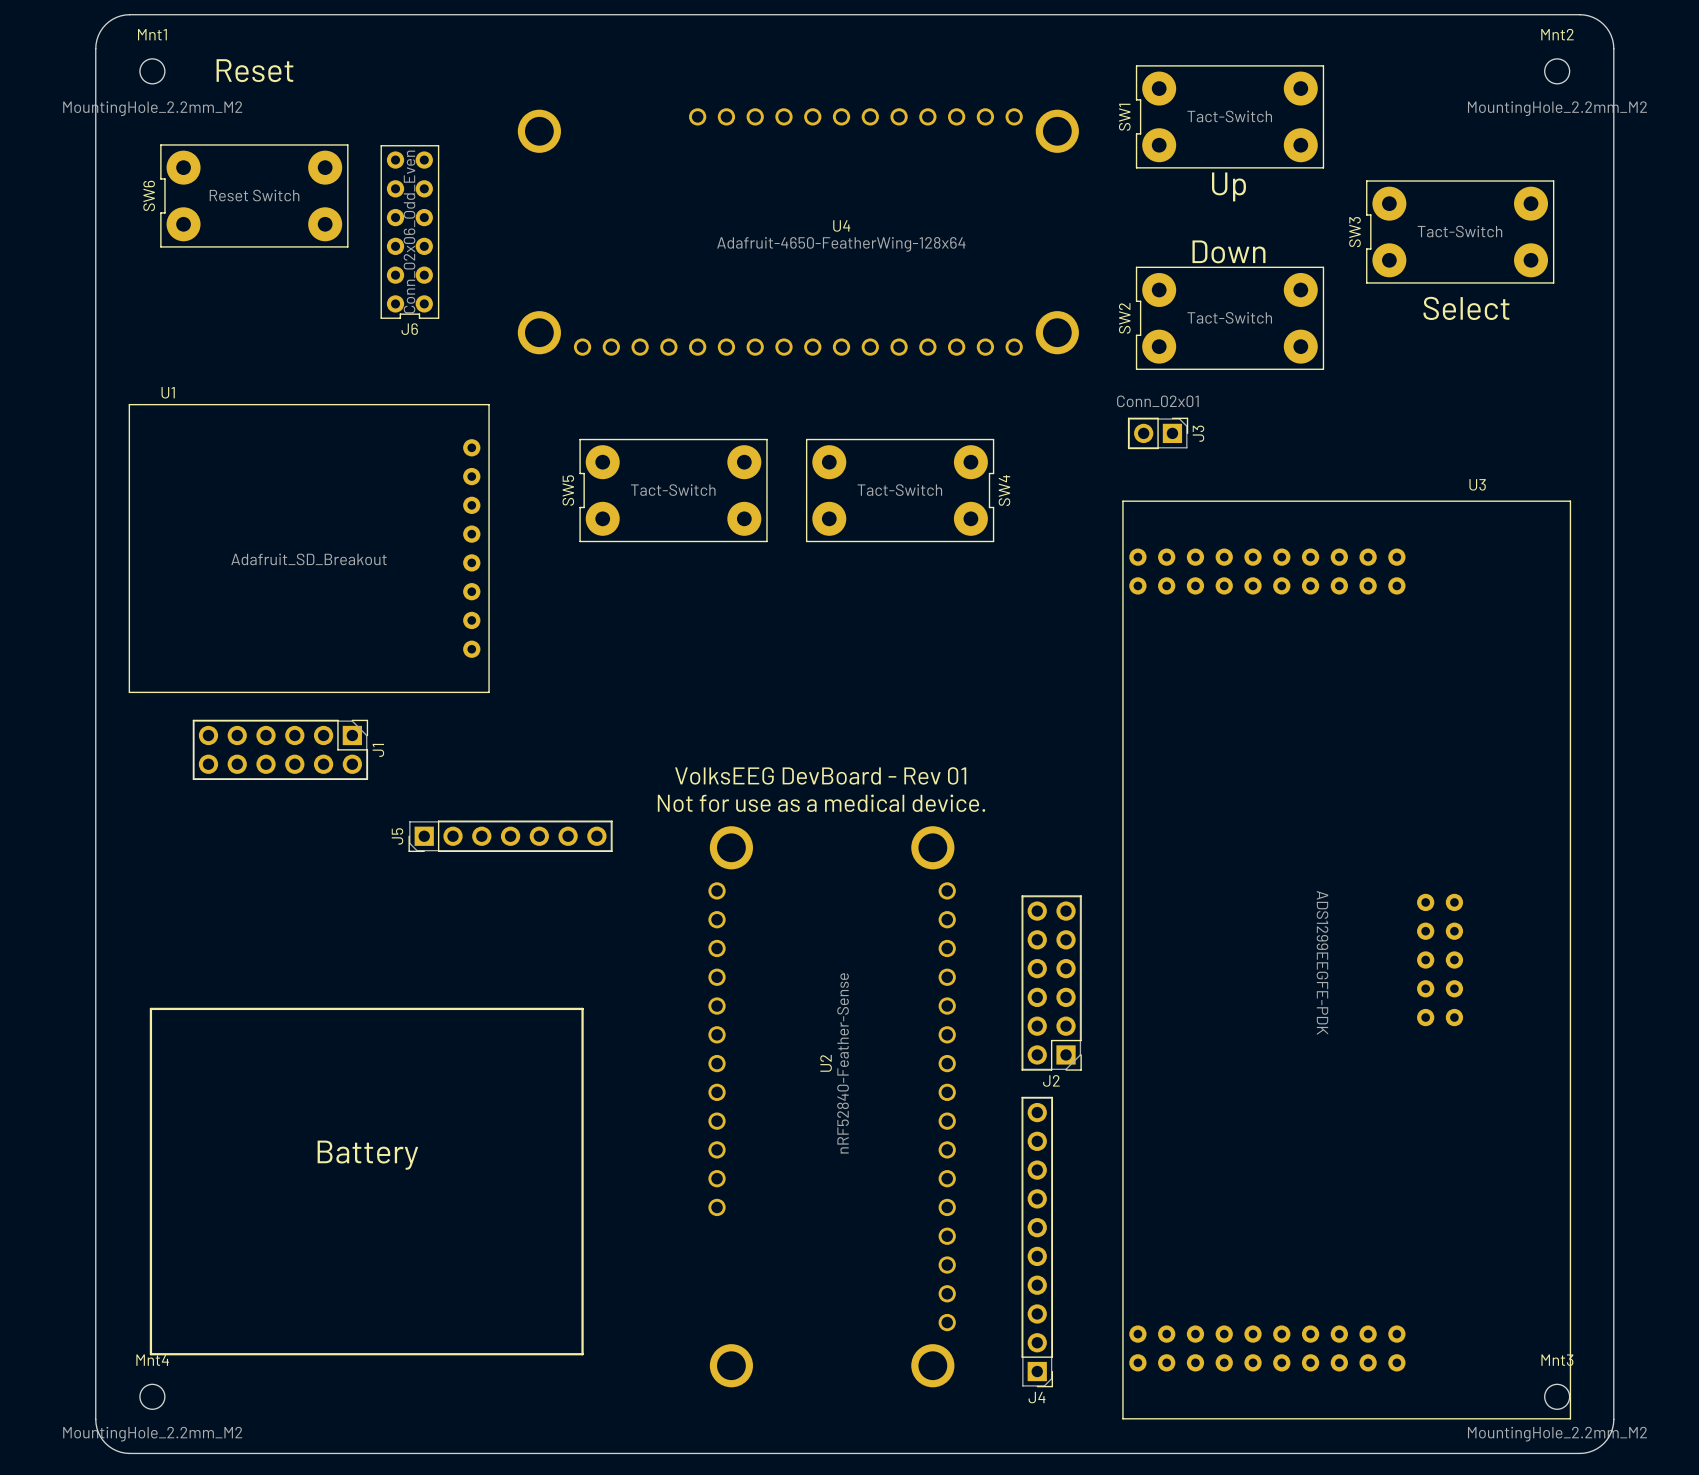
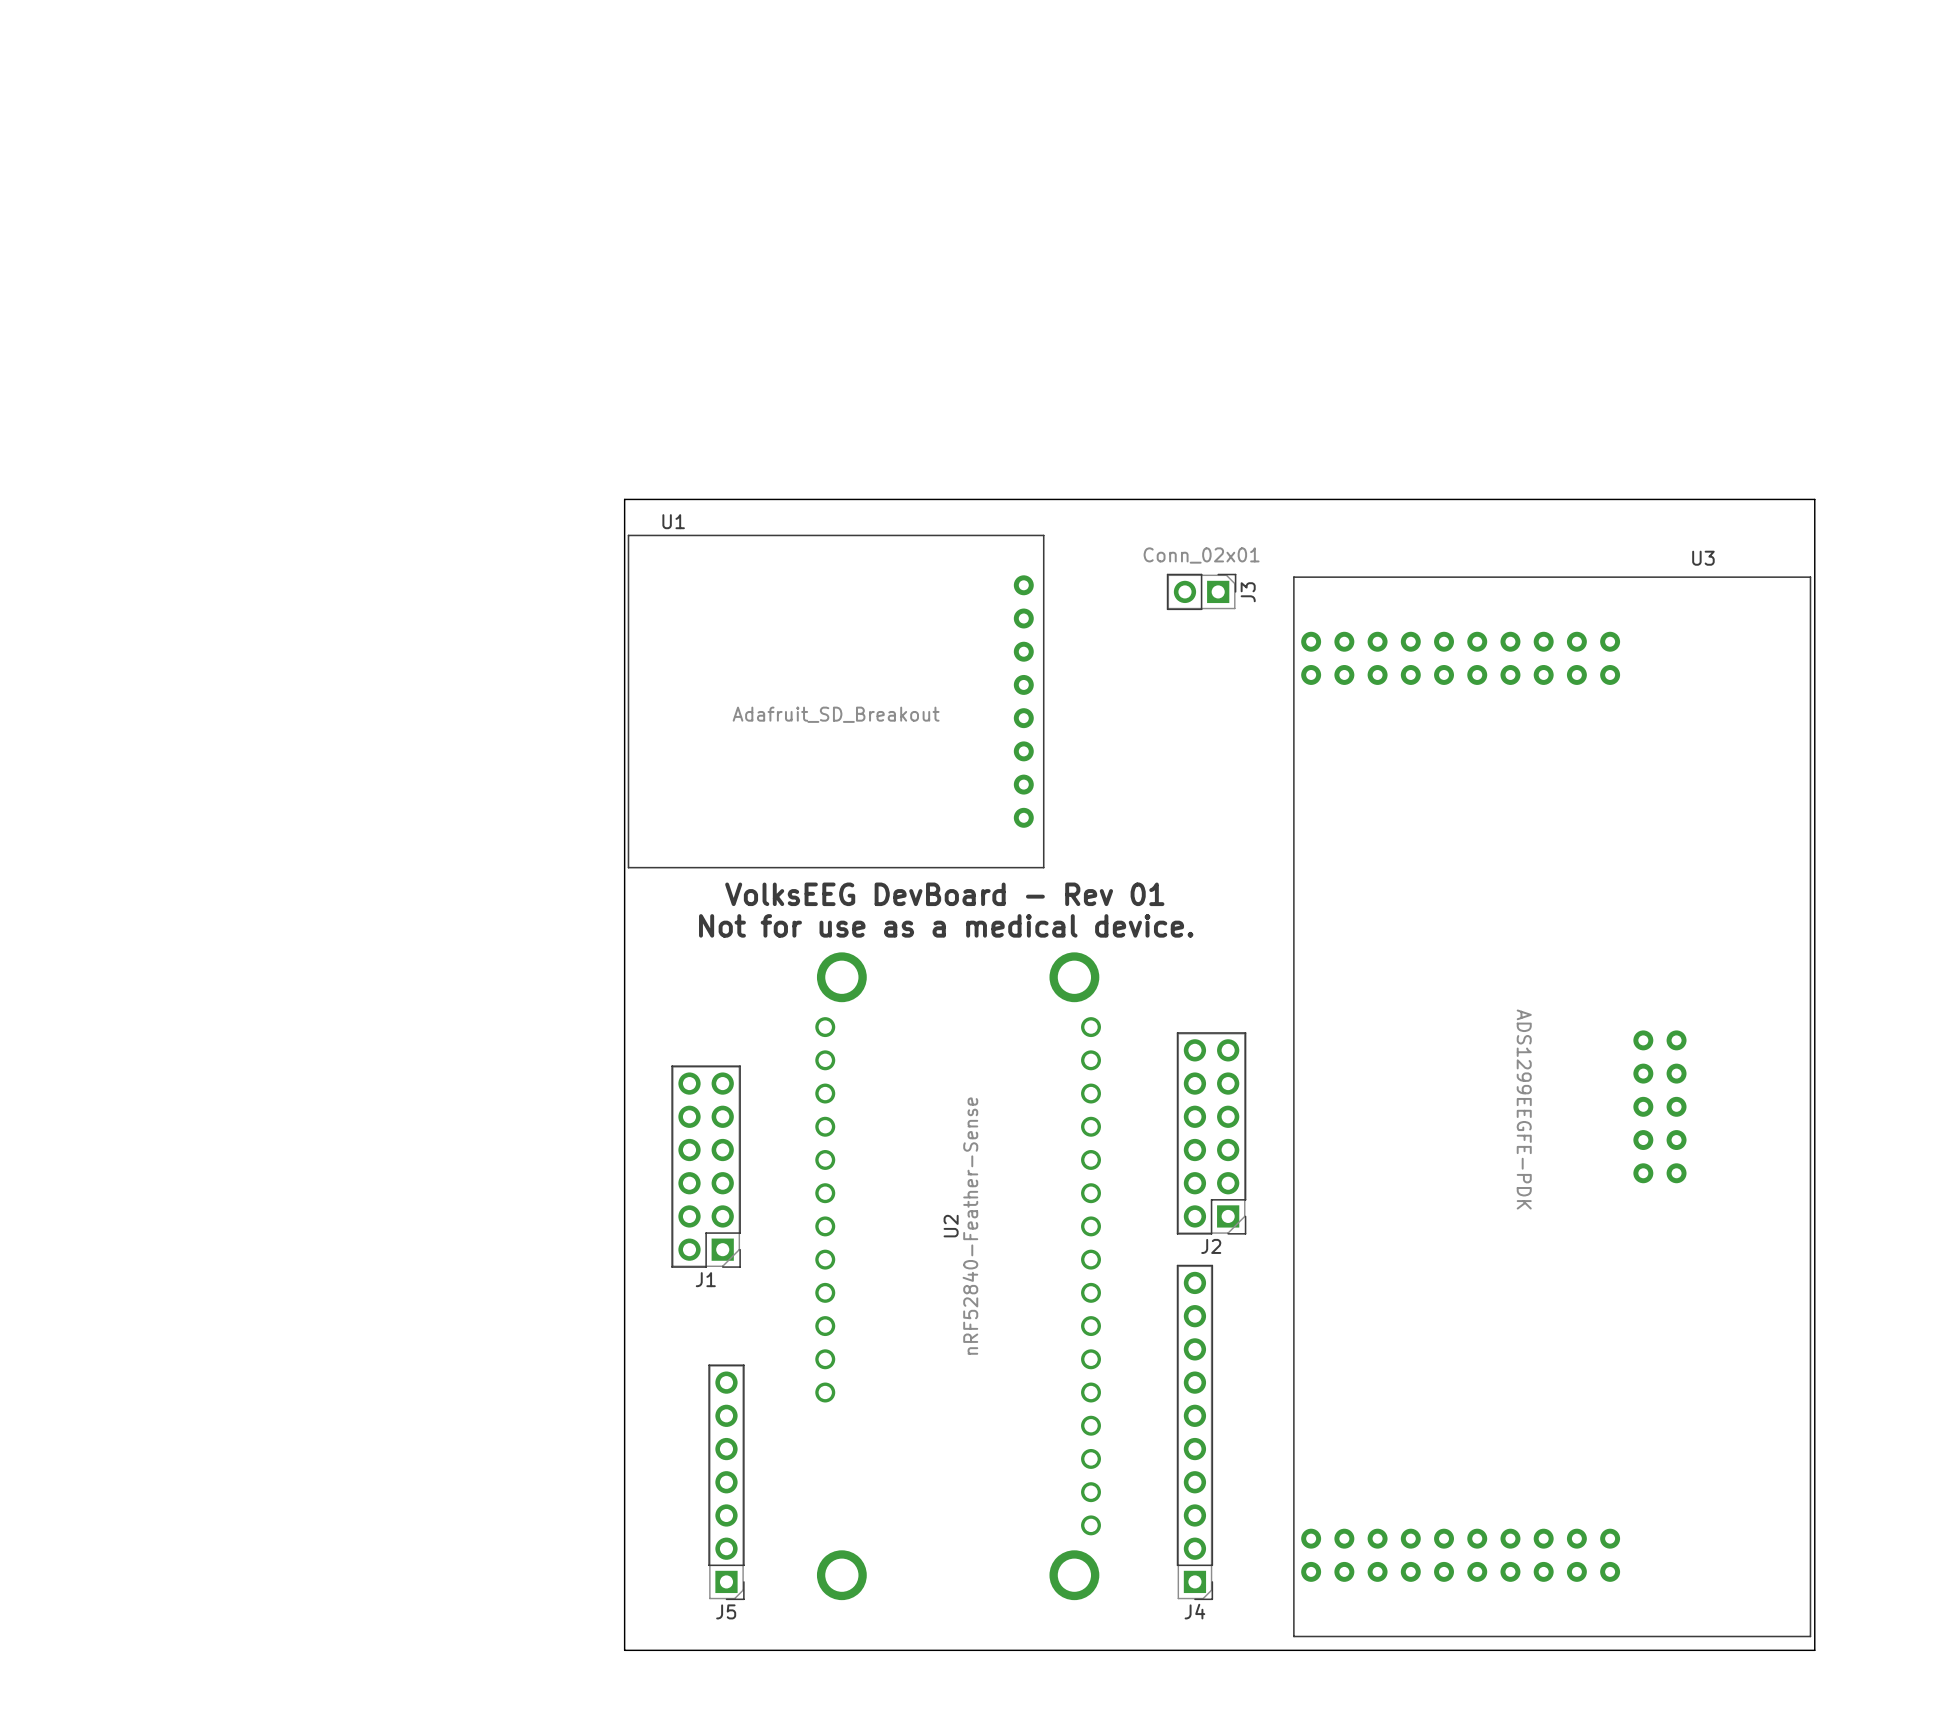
board edge: (129, 14) (1579, 14) (1592, 17) (1603, 24) (1611, 35) (1613, 48) (1613, 1419) (1611, 1432) (1603, 1443) (1592, 1450) (1579, 1453) (129, 1453) (116, 1450) (105, 1443) (98, 1432) (95, 1419) (95, 48) (98, 35) (105, 24) (116, 17) (129, 14) -> none
text: Reset (254, 70) -> none
Mnt1: MountingHole_2.2mm_M2 (152, 71) -> none
Mnt2: MountingHole_2.2mm_M2 (1557, 71) -> none
SW1: Tact-Switch (1229, 116) -> none
text: Up (1228, 186) -> none
SW6: Reset Switch (254, 195) -> none
J6: Conn_02x06_Odd_Even (409, 231) -> none
U4: Adafruit-4650-FeatherWing-128x64 (798, 231) -> none
SW3: Tact-Switch (1460, 231) -> none
text: Down (1228, 251) -> none
text: Select (1466, 308) -> none
SW2: Tact-Switch (1229, 318) -> none
board edge: none -> (624, 499) (1814, 499) (1814, 1650) (624, 1650) (624, 499)
J3 position: (1158, 433) -> (1201, 591)
SW5: Tact-Switch (673, 490) -> none
SW4: Tact-Switch (900, 490) -> none
U1 position: (309, 548) -> (836, 701)
J1 rotation: 0° (280, 749) -> 90° clockwise (706, 1166)
J1 position: (280, 749) -> (706, 1166)
J5 rotation: 0° (510, 836) -> 90° counterclockwise (726, 1482)
J5 position: (510, 836) -> (726, 1482)
line: (150, 1008) (582, 1008) (582, 1354) (150, 1354) (150, 1008) -> none
text: Battery (367, 1155) -> none
Mnt4: MountingHole_2.2mm_M2 (152, 1396) -> none
Mnt3: MountingHole_2.2mm_M2 (1557, 1396) -> none

